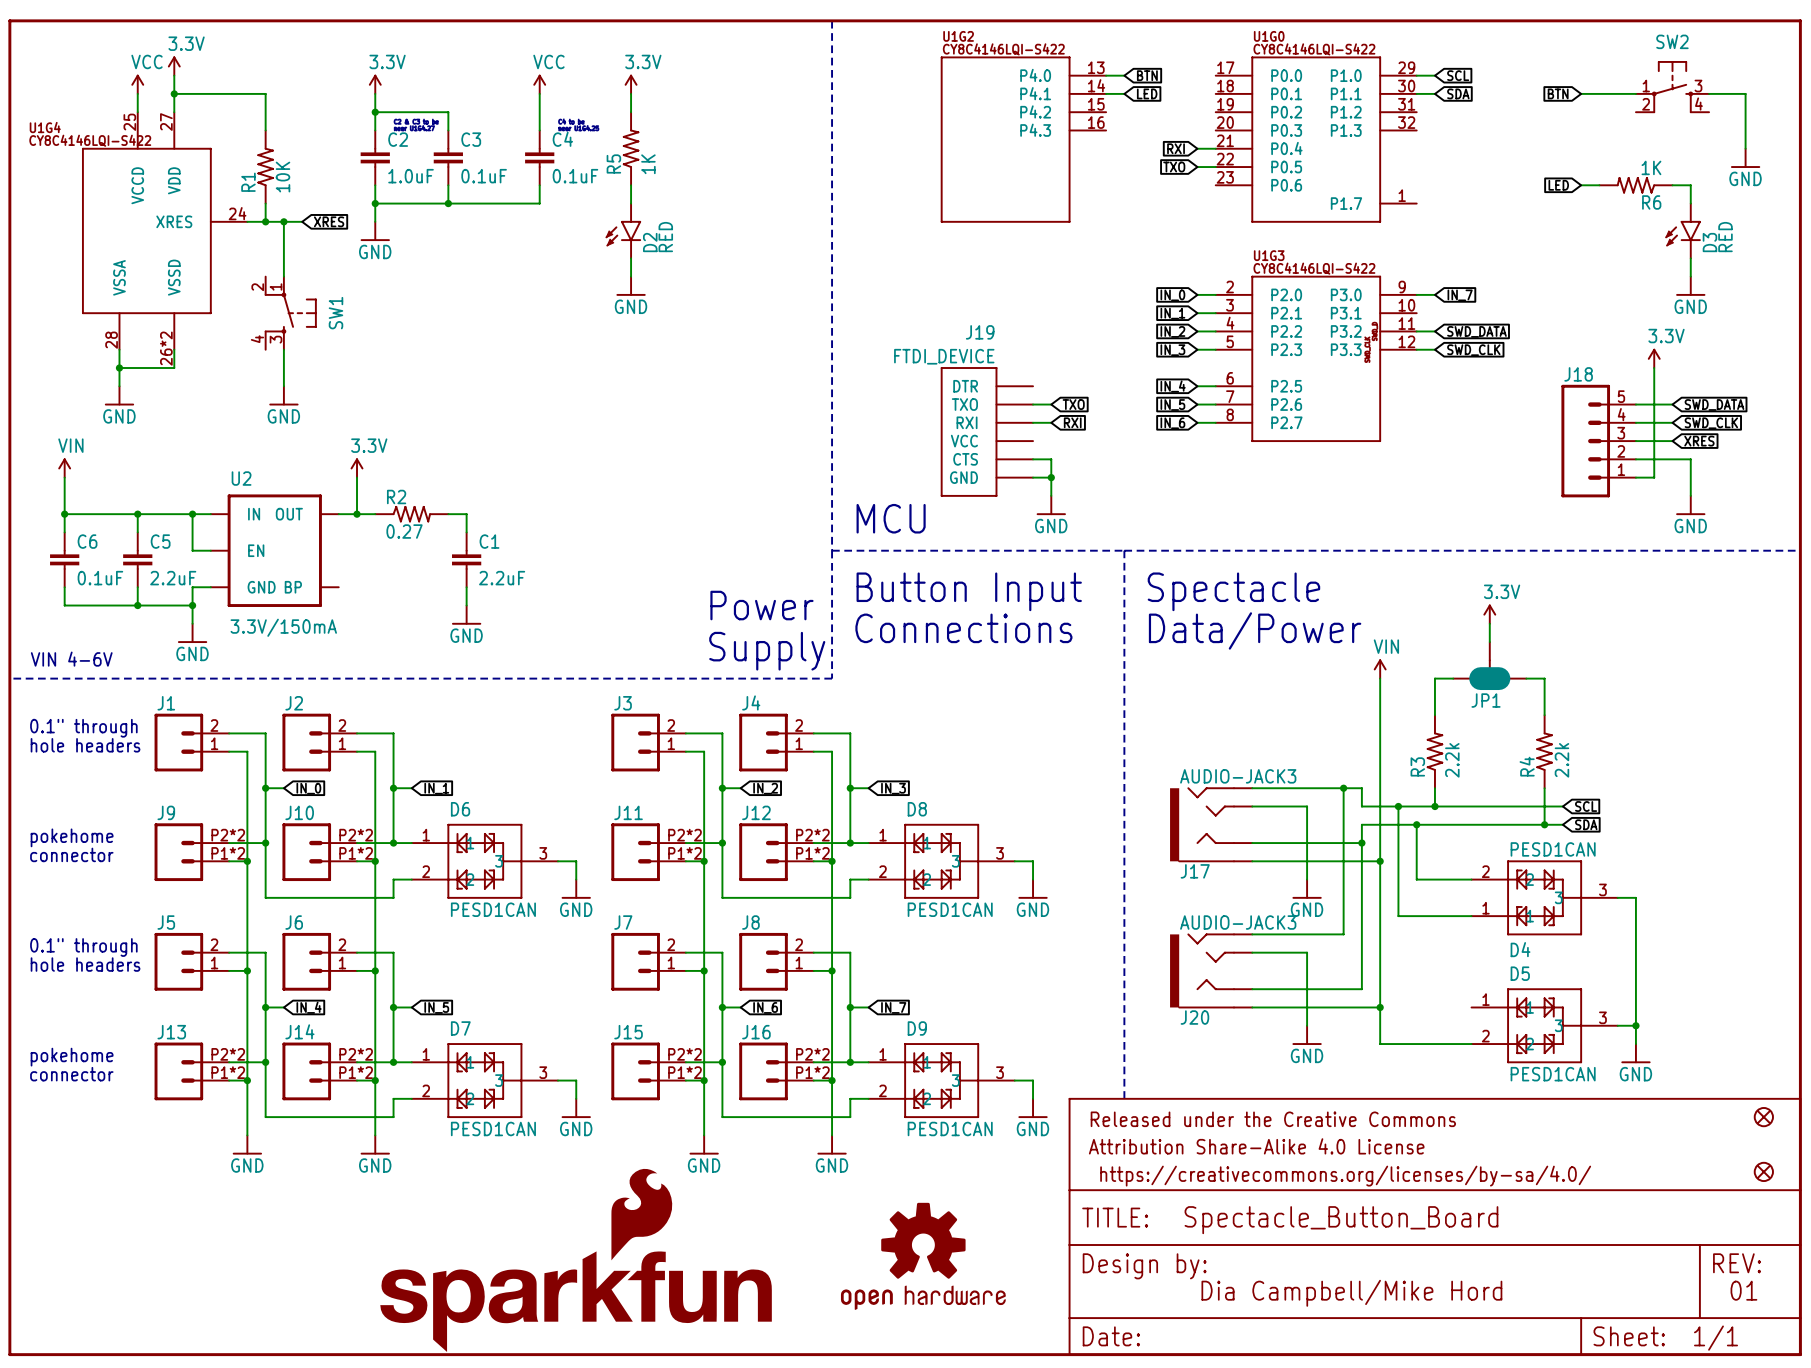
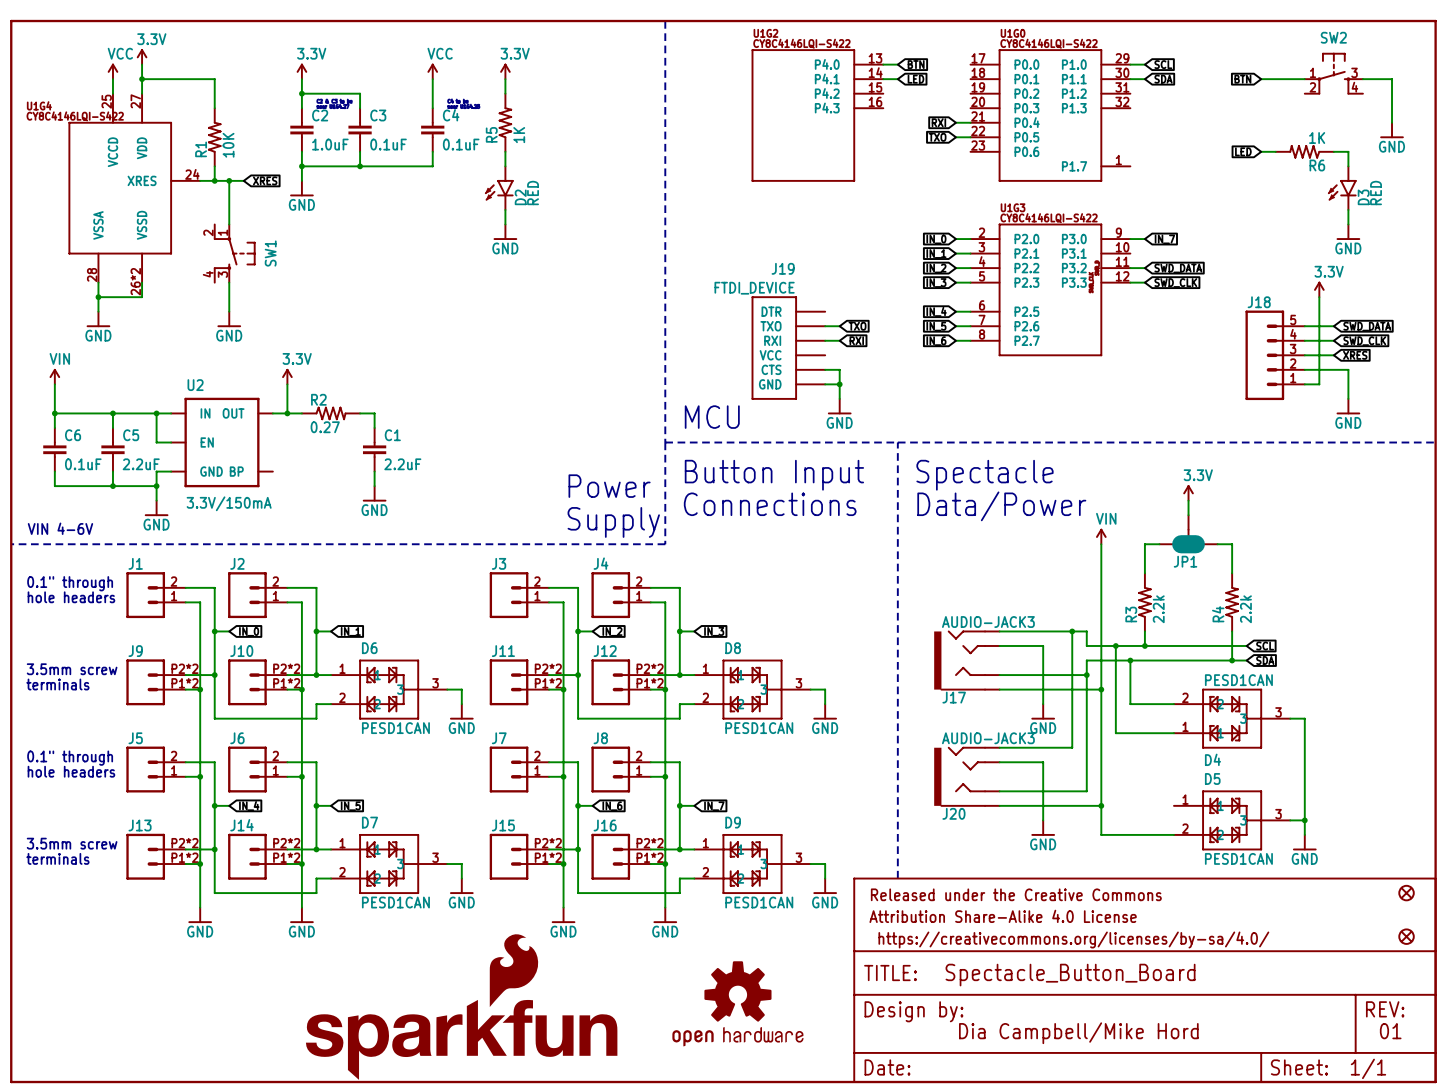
text: pokehome (72, 837) -> 3.5mm screw (72, 669)
text: connector (71, 854) -> terminals (57, 684)
text: pokehome (72, 1057) -> 3.5mm screw (72, 843)
text: connector (71, 1074) -> terminals (57, 858)

